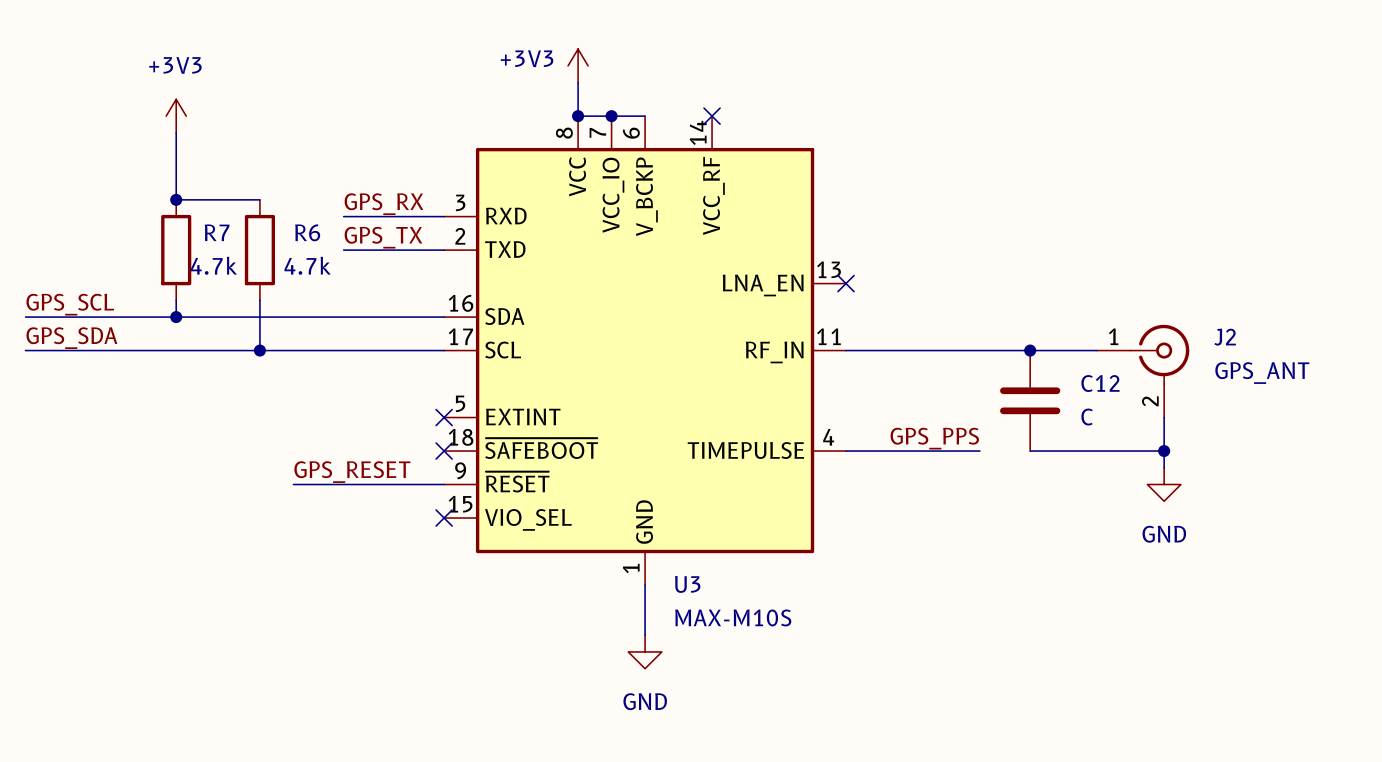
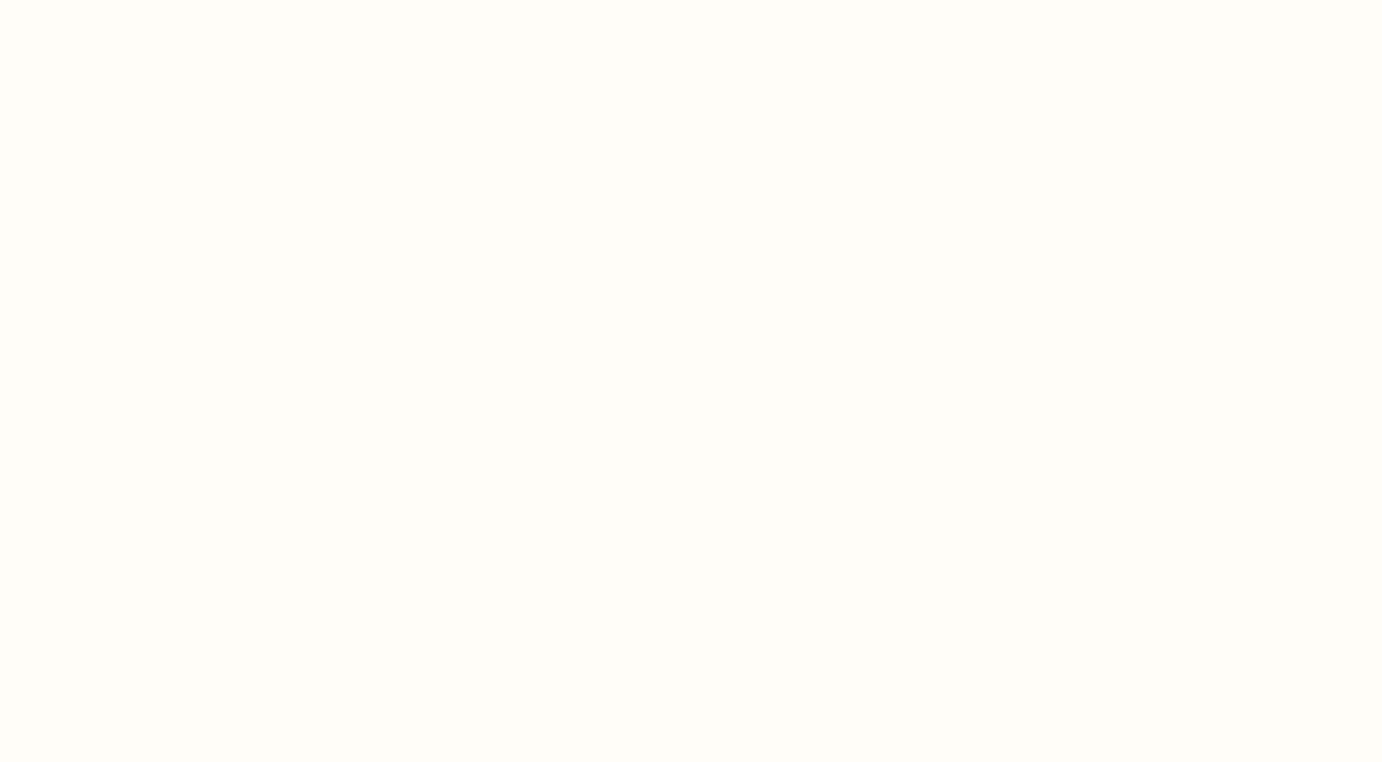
power symbol: +3V3 (578, 65) -> none
wire: (578, 82) (578, 116) (645, 116) -> none
power symbol: +3V3 (176, 116) -> none
junction: (578, 116) -> none
junction: (611, 116) -> none
no-connect mark: (712, 116) -> none
wire: (176, 132) (176, 199) (259, 199) -> none
junction: (176, 199) -> none
label: GPS_RX (383, 204) -> none
wire: (343, 216) (444, 216) -> none
label: GPS_TX (383, 237) -> none
R7: 4.7k (176, 250) -> none
R6: 4.7k (259, 250) -> none
wire: (343, 250) (444, 250) -> none
no-connect mark: (845, 283) -> none
wire: (176, 300) (176, 317) -> none
wire: (259, 300) (259, 350) -> none
label: GPS_SCL (70, 304) -> none
wire: (25, 317) (444, 317) -> none
junction: (176, 317) -> none
label: GPS_SDA (71, 338) -> none
wire: (25, 350) (444, 350) -> none
junction: (259, 350) -> none
U3: MAX-M10S (645, 350) -> none
wire: (845, 350) (1097, 350) -> none
junction: (1030, 350) -> none
J2: GPS_ANT (1143, 371) -> none
C12: C (1030, 400) -> none
no-connect mark: (444, 417) -> none
wire: (1164, 417) (1164, 467) -> none
label: GPS_PPS (934, 438) -> none
no-connect mark: (444, 451) -> none
wire: (845, 451) (979, 451) -> none
wire: (1030, 451) (1164, 451) -> none
junction: (1164, 451) -> none
label: GPS_RESET (352, 472) -> none
wire: (293, 484) (444, 484) -> none
power symbol: GND (1164, 484) -> none
no-connect mark: (444, 518) -> none
wire: (645, 584) (645, 635) -> none
power symbol: GND (645, 651) -> none

